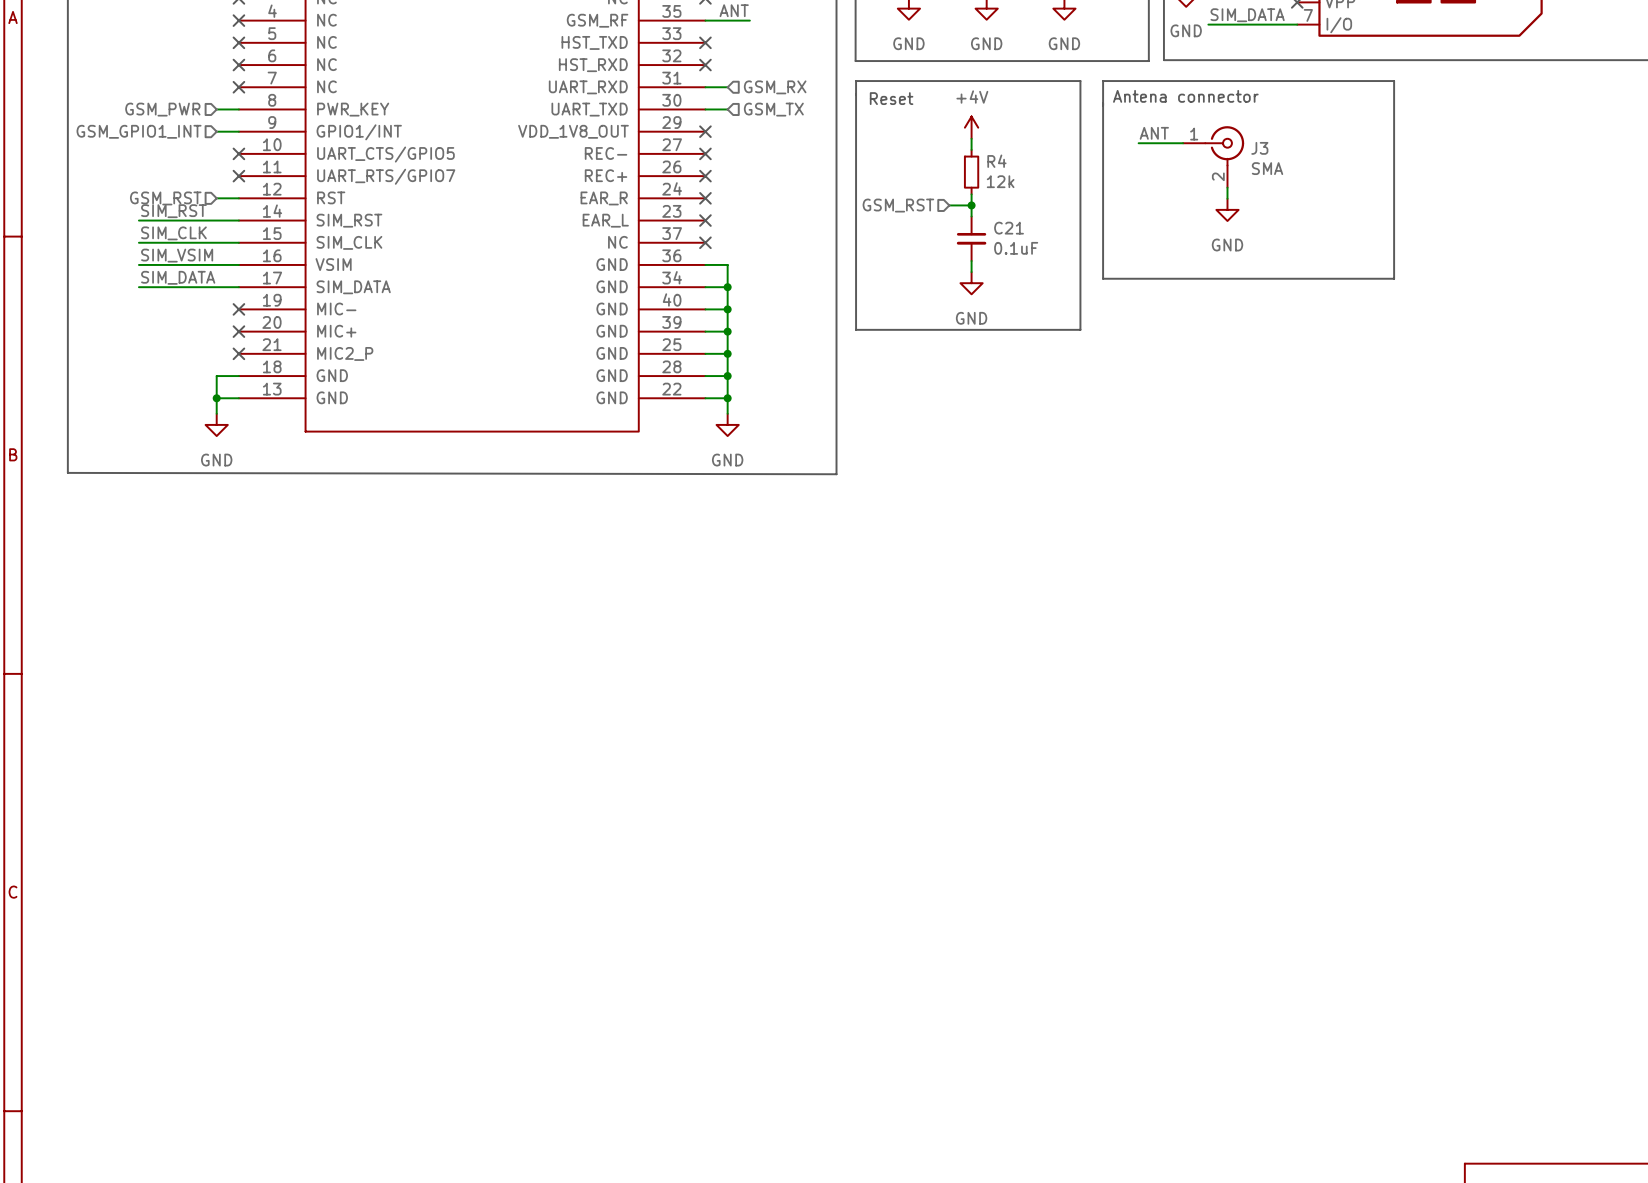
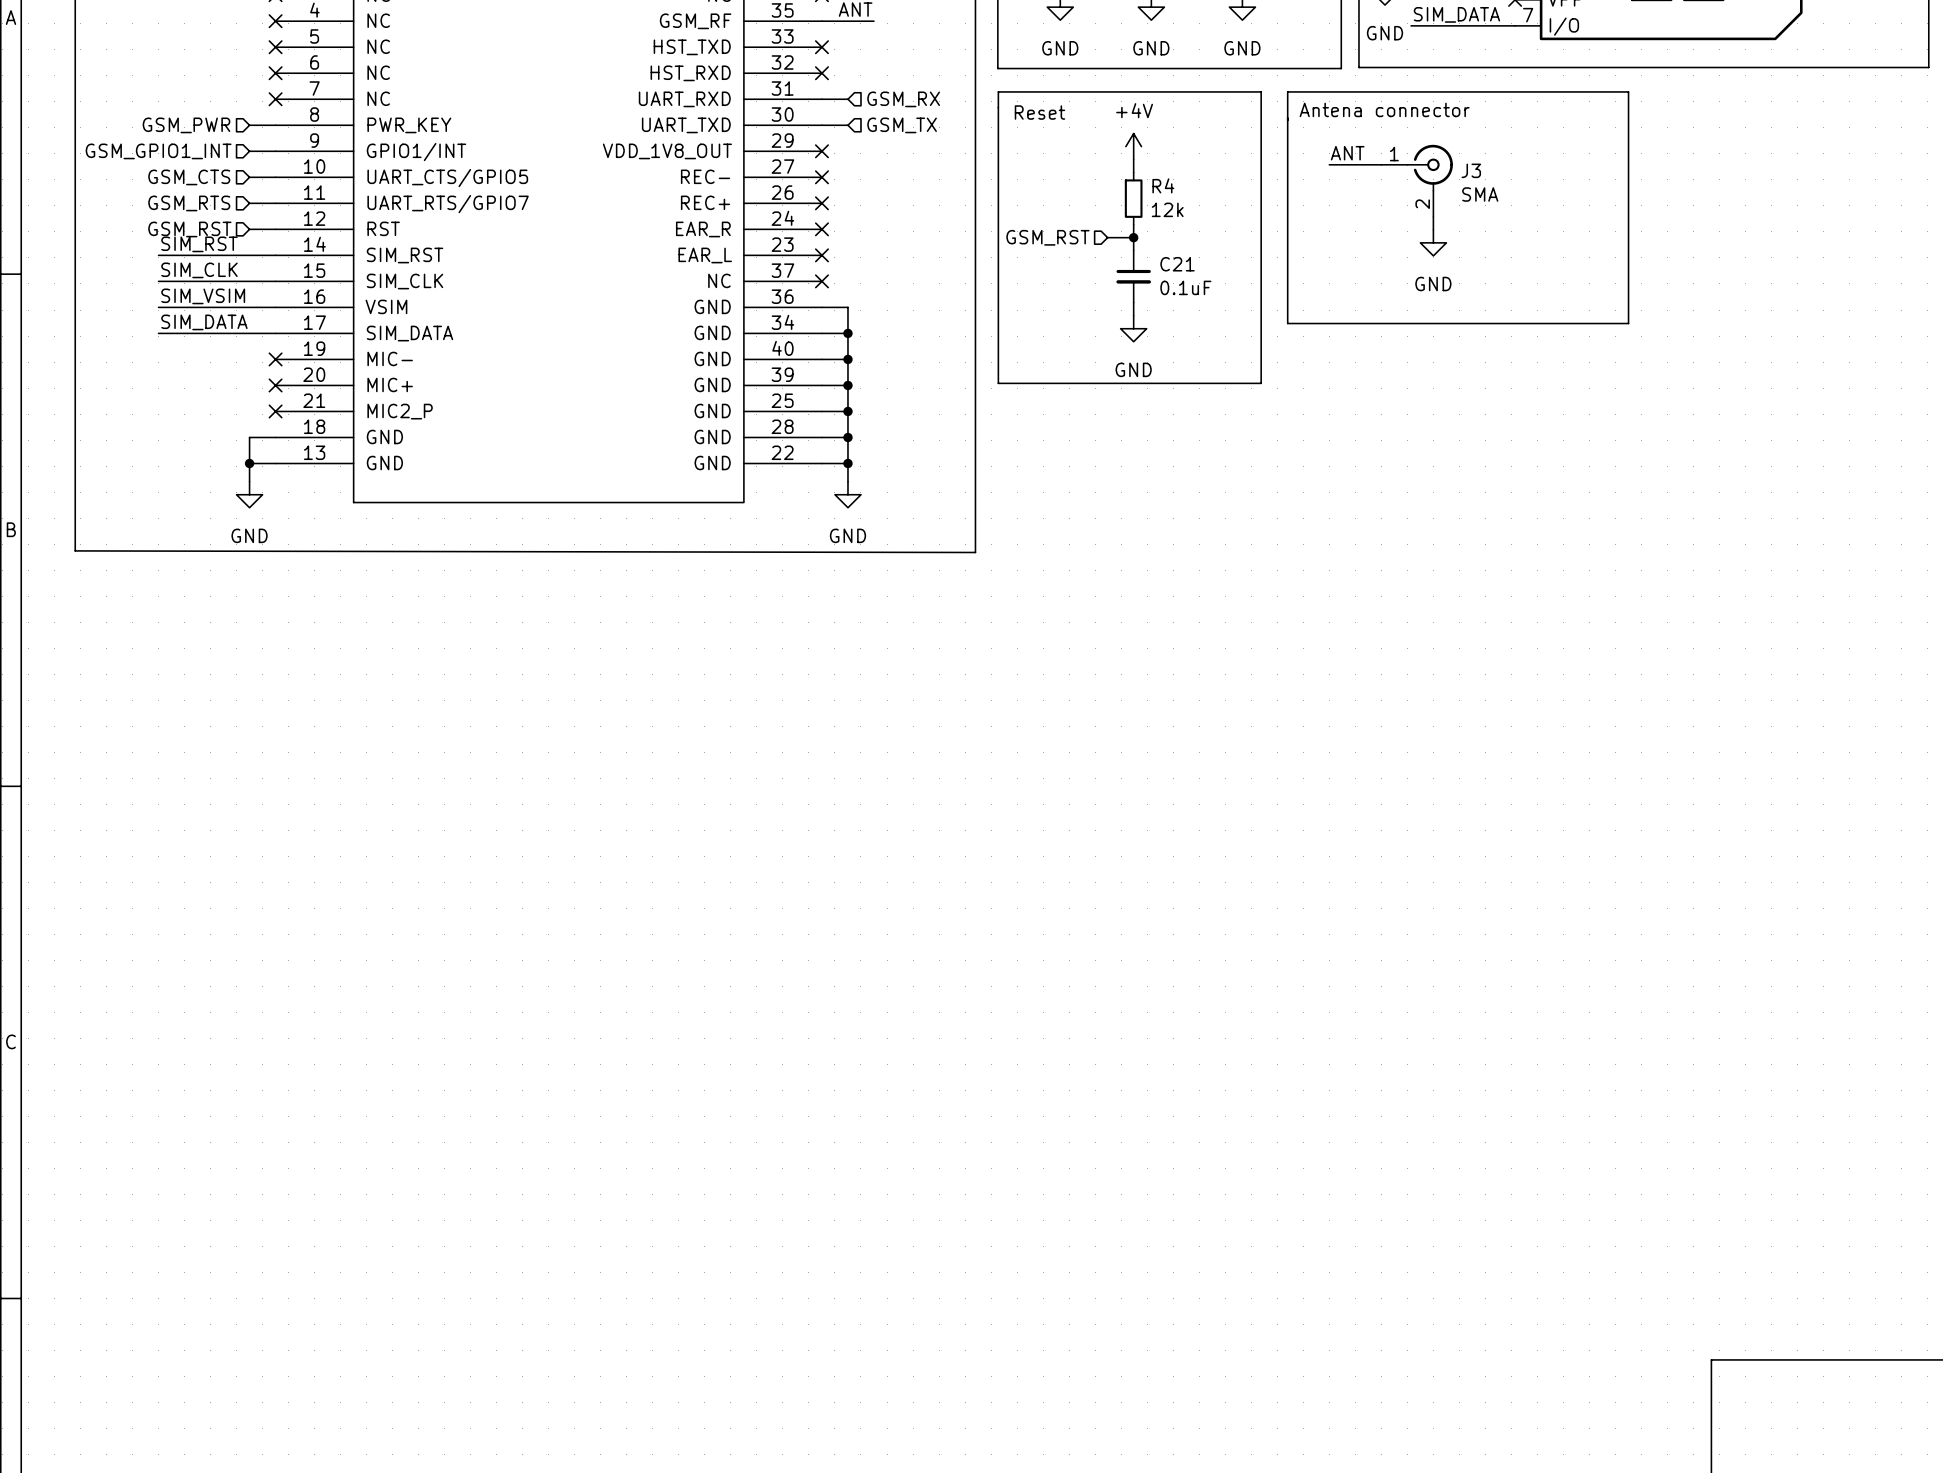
wire: none -> (249, 177) (275, 177)
no-connect mark: (238, 153) -> none
hierarchical label: none -> GSM_CTS (189, 177)
hierarchical label: none -> GSM_RTS (189, 203)
wire: none -> (249, 203) (275, 203)
no-connect mark: (238, 176) -> none

